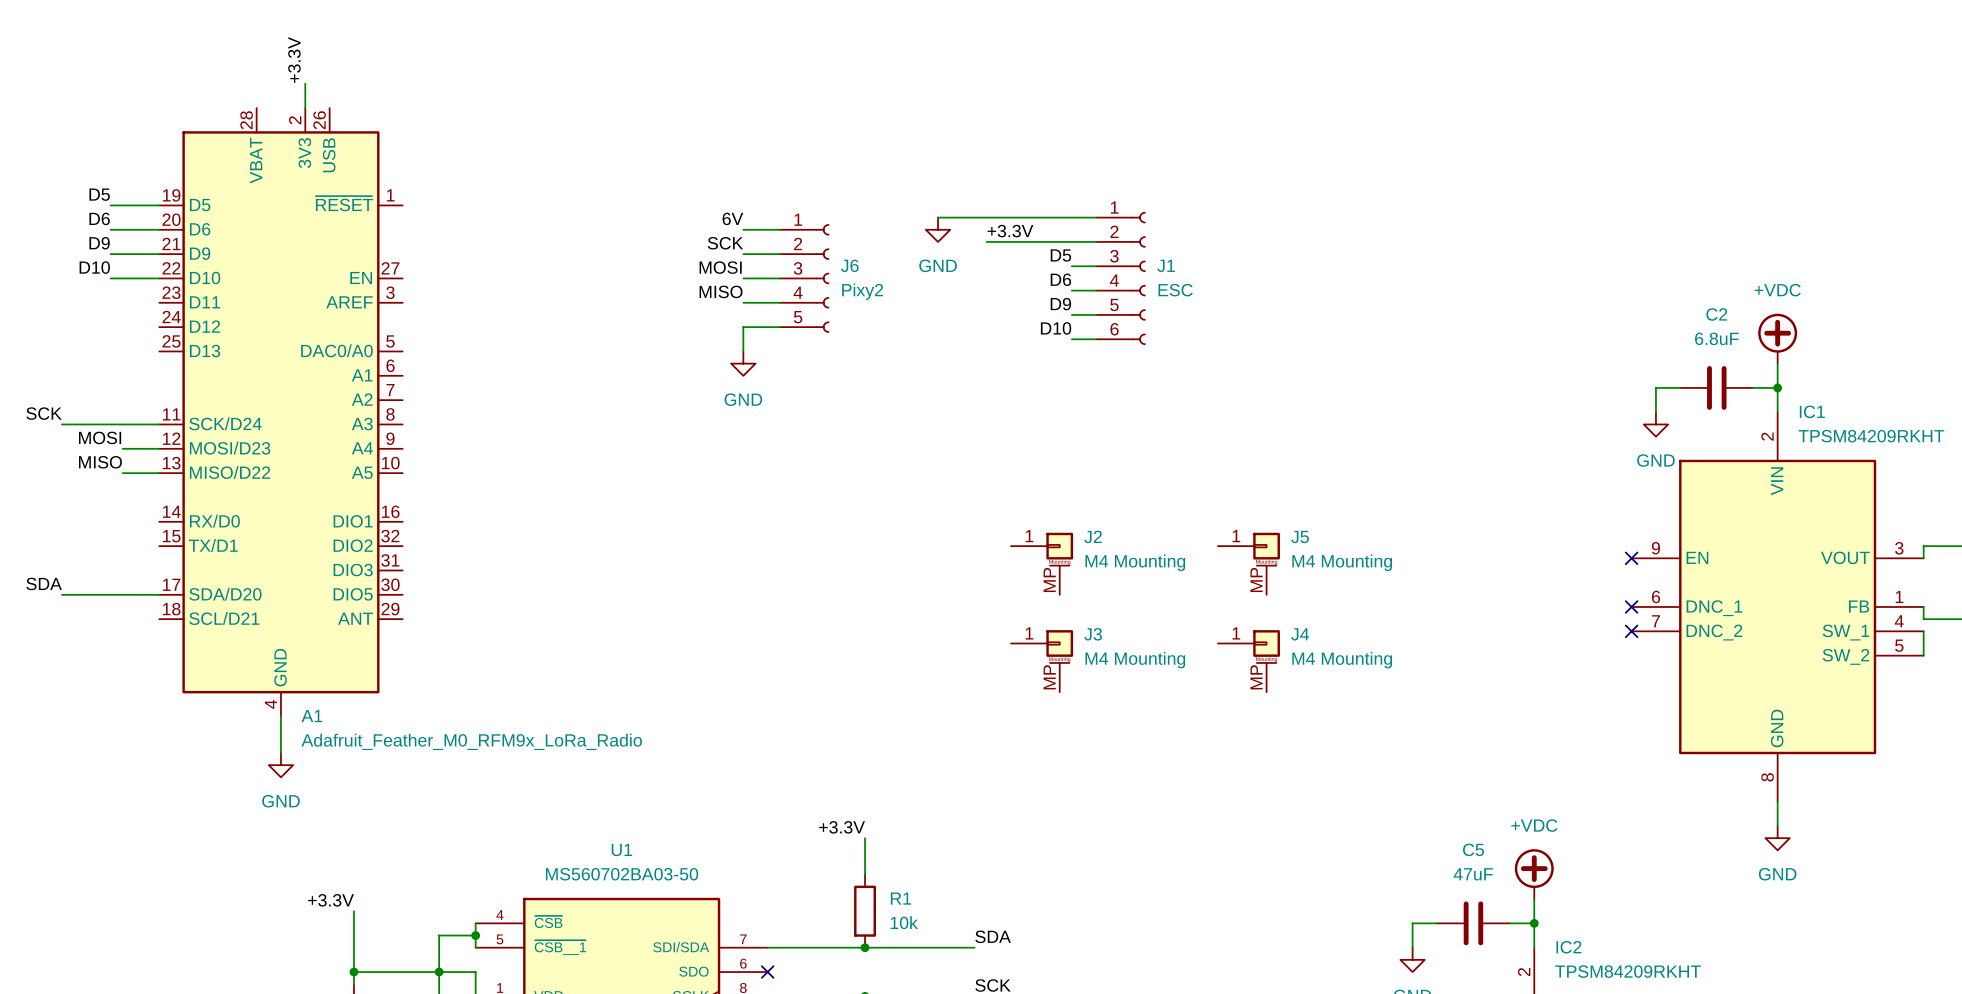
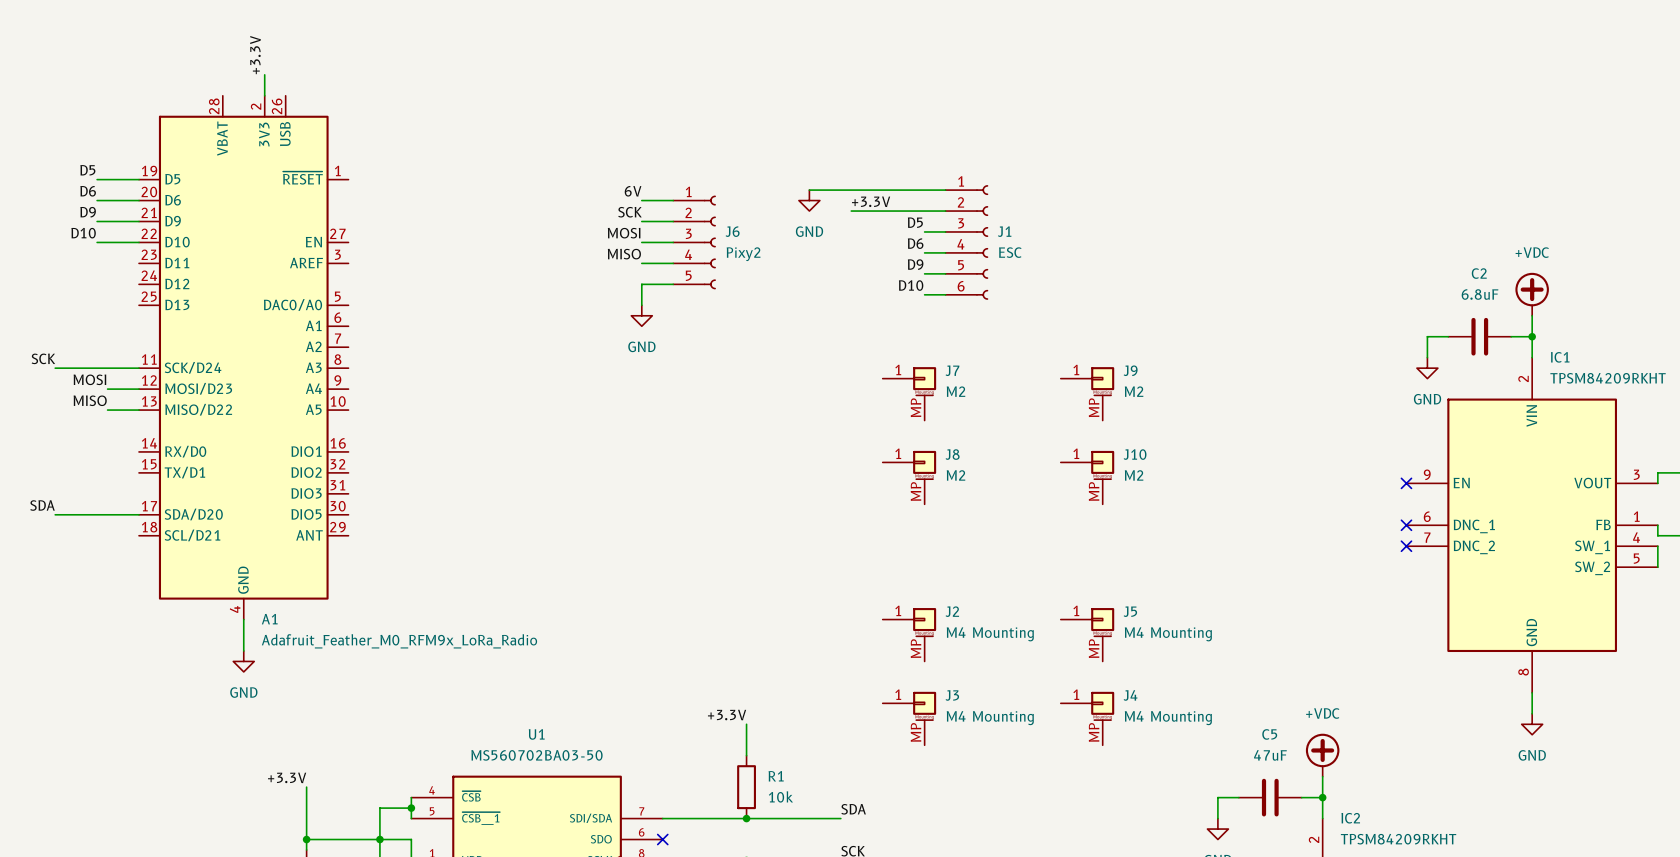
J7: none -> M2 (909, 393)
J9: none -> M2 (1087, 393)
J8: none -> M2 (909, 477)
J10: none -> M2 (1087, 477)
J2 position: (1042, 563) -> (909, 634)
J5 position: (1248, 563) -> (1087, 634)
J3 position: (1042, 661) -> (909, 718)
J4 position: (1248, 661) -> (1087, 718)

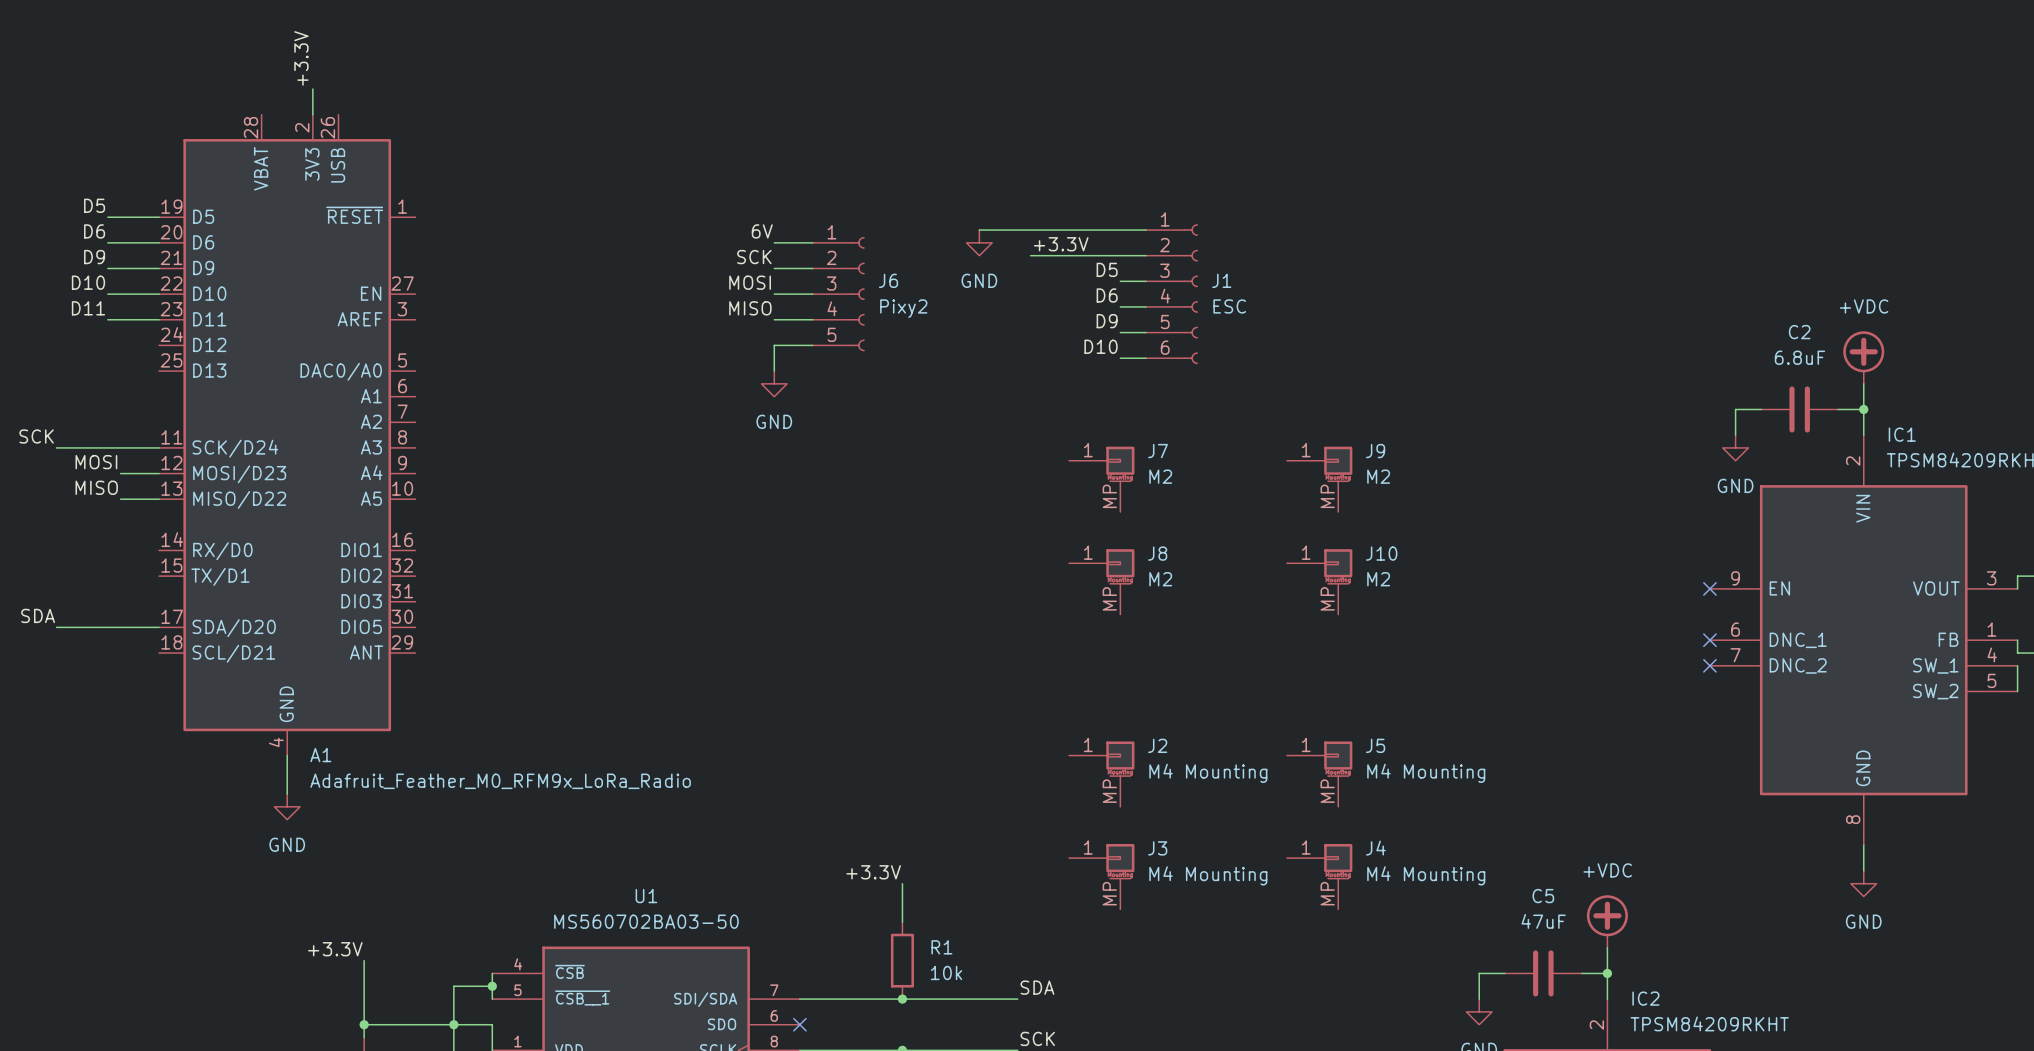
label: none -> D11 (88, 308)
wire: none -> (107, 319) (159, 319)

